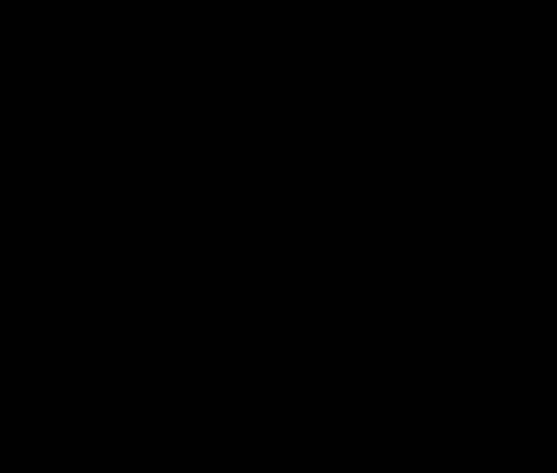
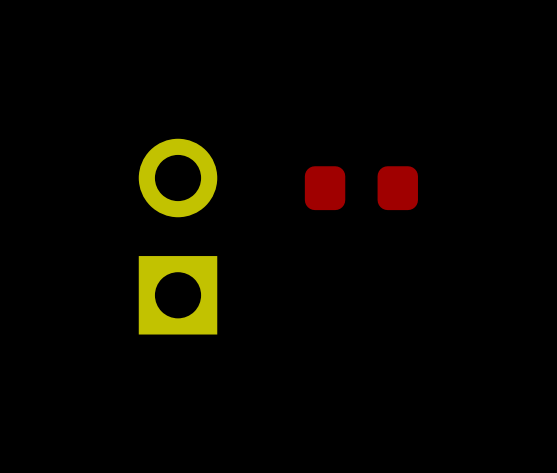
part: none -> (361, 188)
part: none -> (178, 236)

